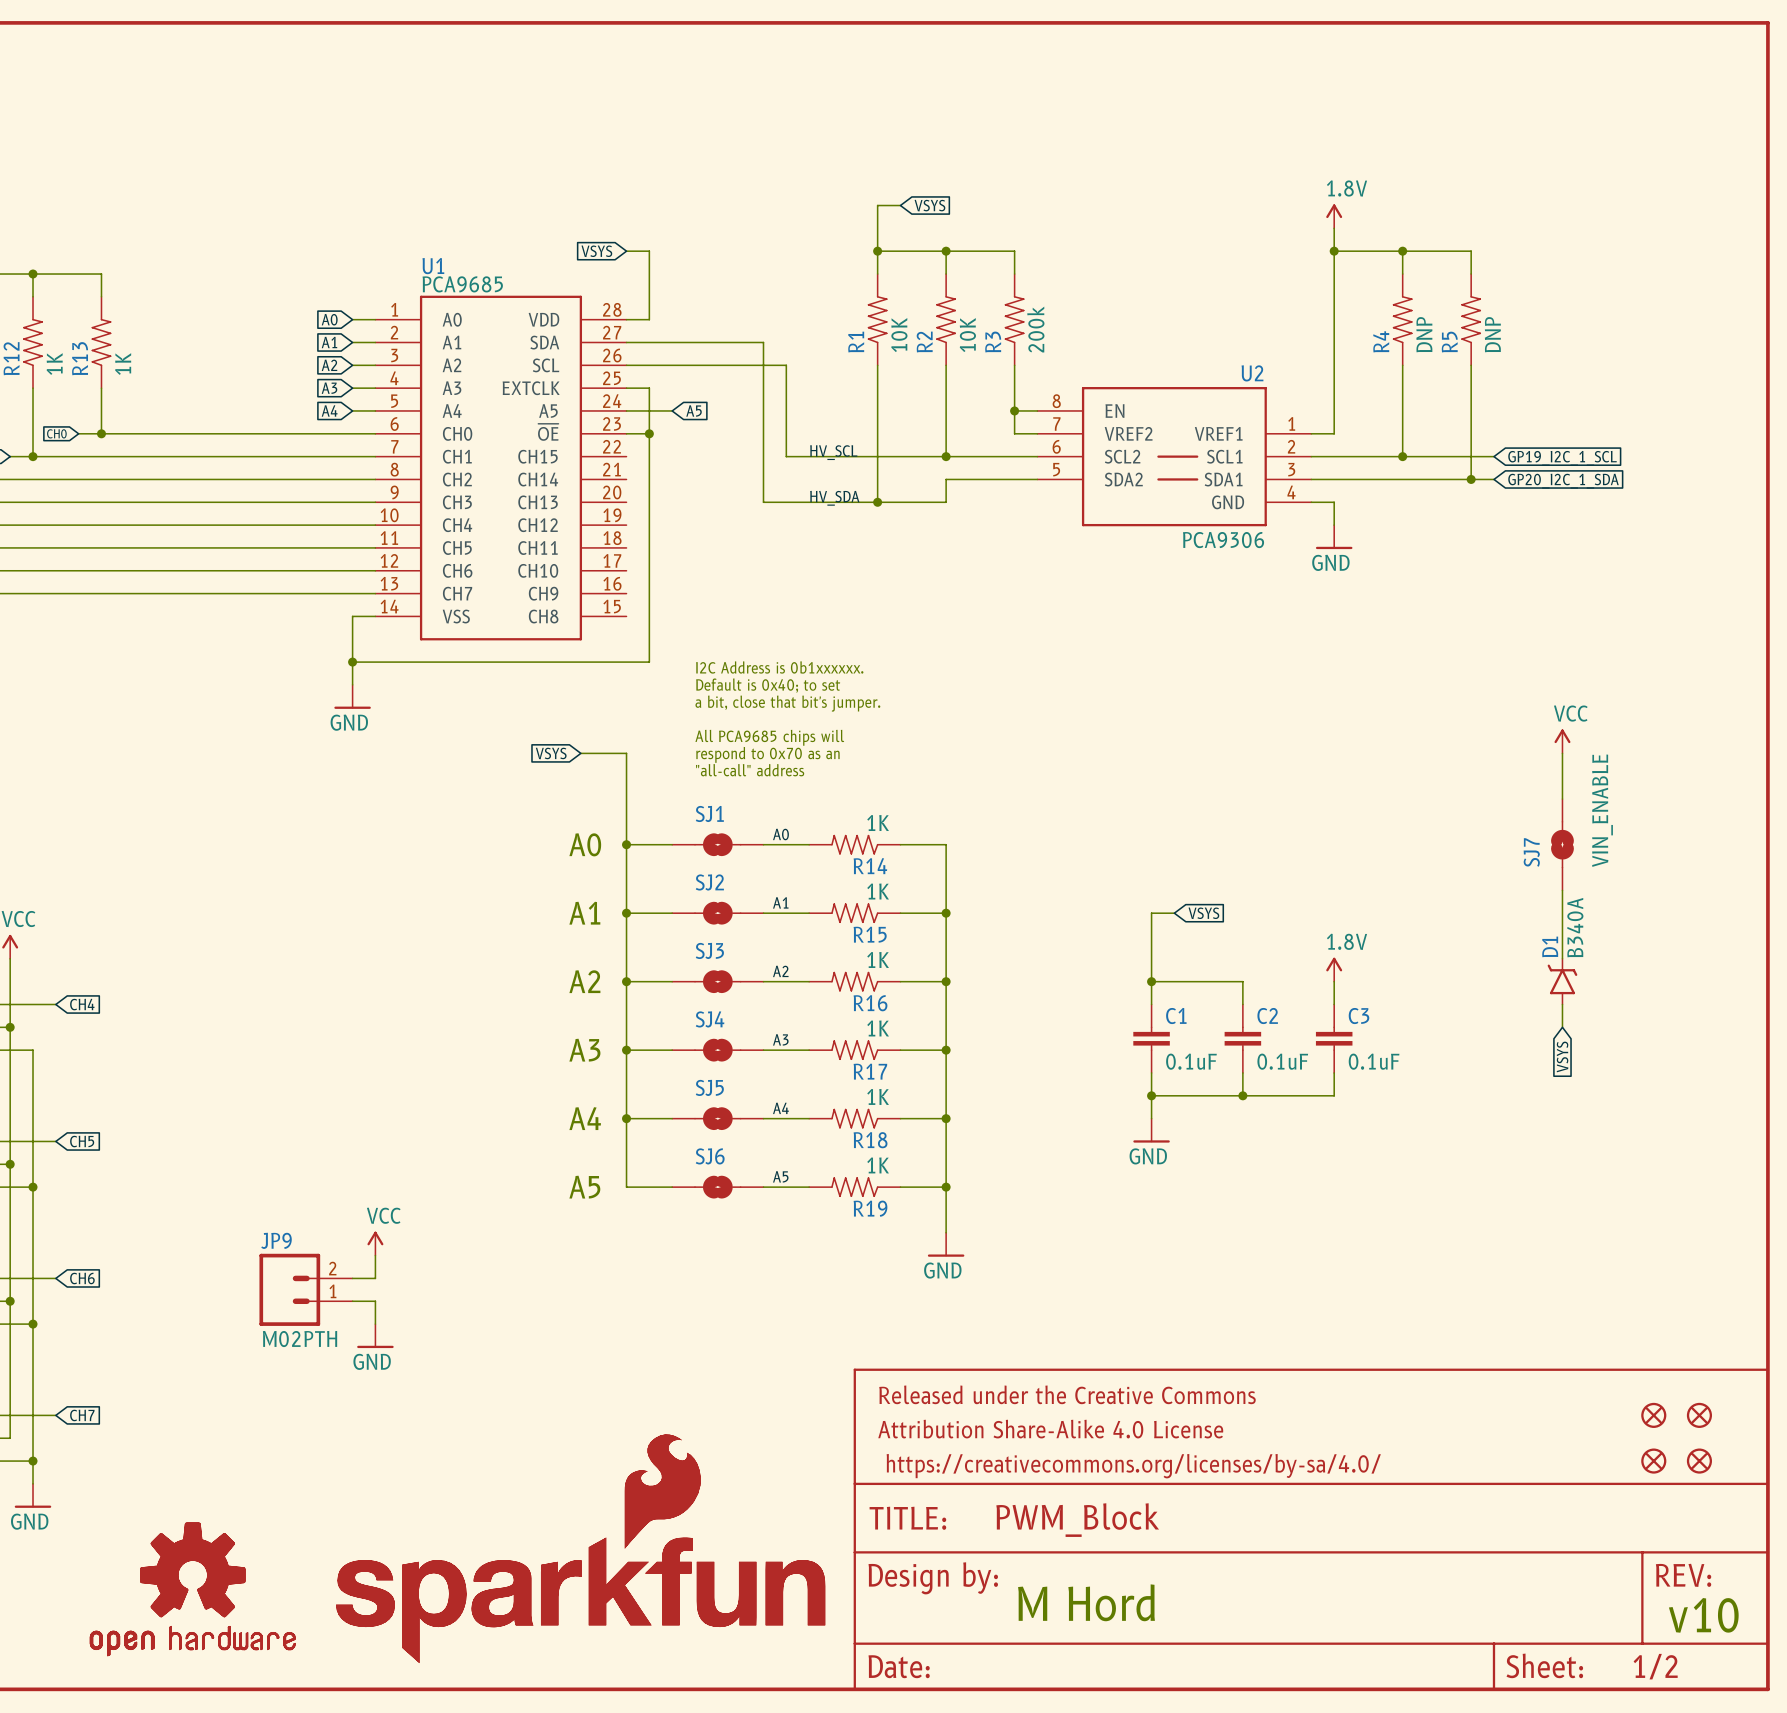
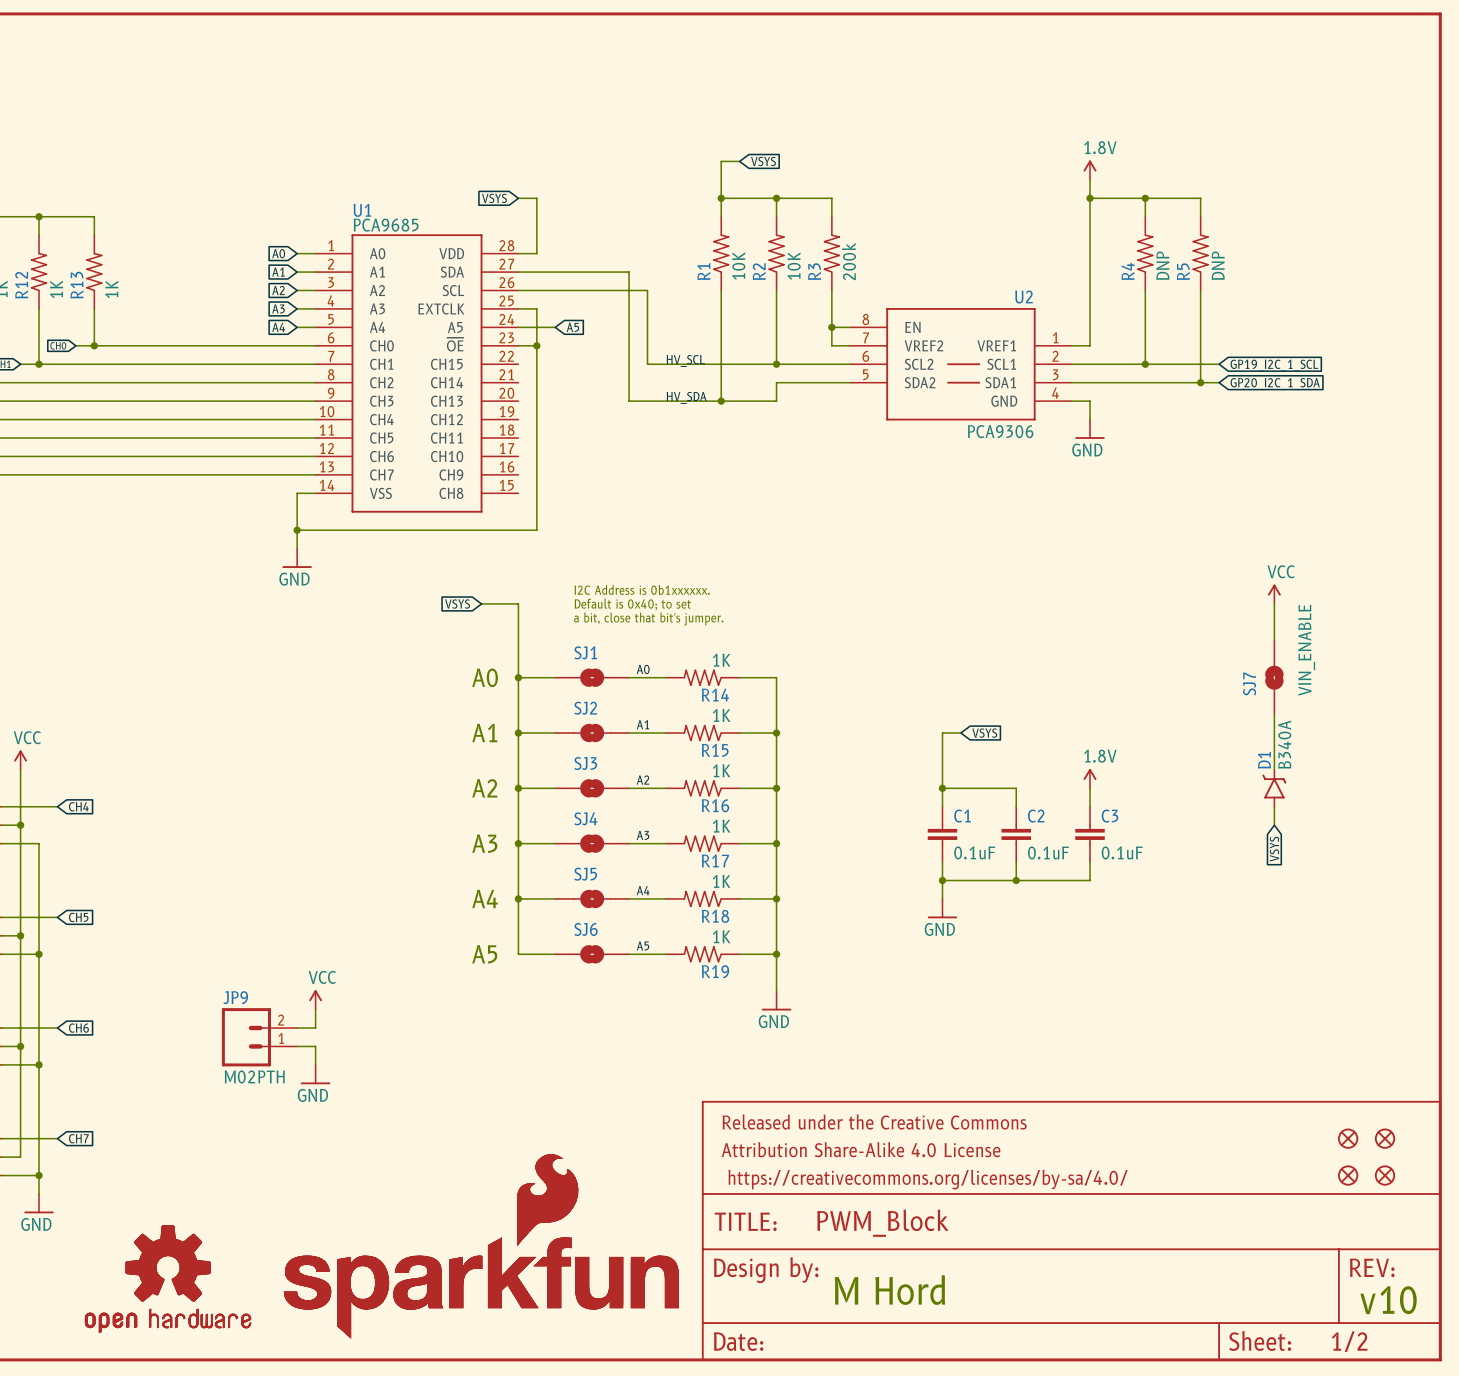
text: I2C Address is 0b1xxxxxx. (779, 667) -> none
text: Default is 0x40; to set (768, 685) -> none
text: a bit, close that bit's jumper. (787, 703) -> none
text: All PCA9685 chips will (769, 737) -> I2C Address is 0b1xxxxxx. (642, 589)
text: respond to 0x70 as an (768, 754) -> Default is 0x40; to set (632, 604)
text: "all-call" address (750, 770) -> a bit, close that bit's jumper. (648, 619)

